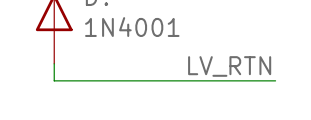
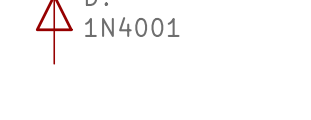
wire: (54, 63) (54, 80) (275, 80) -> none
label: LV_RTN (229, 66) -> none

